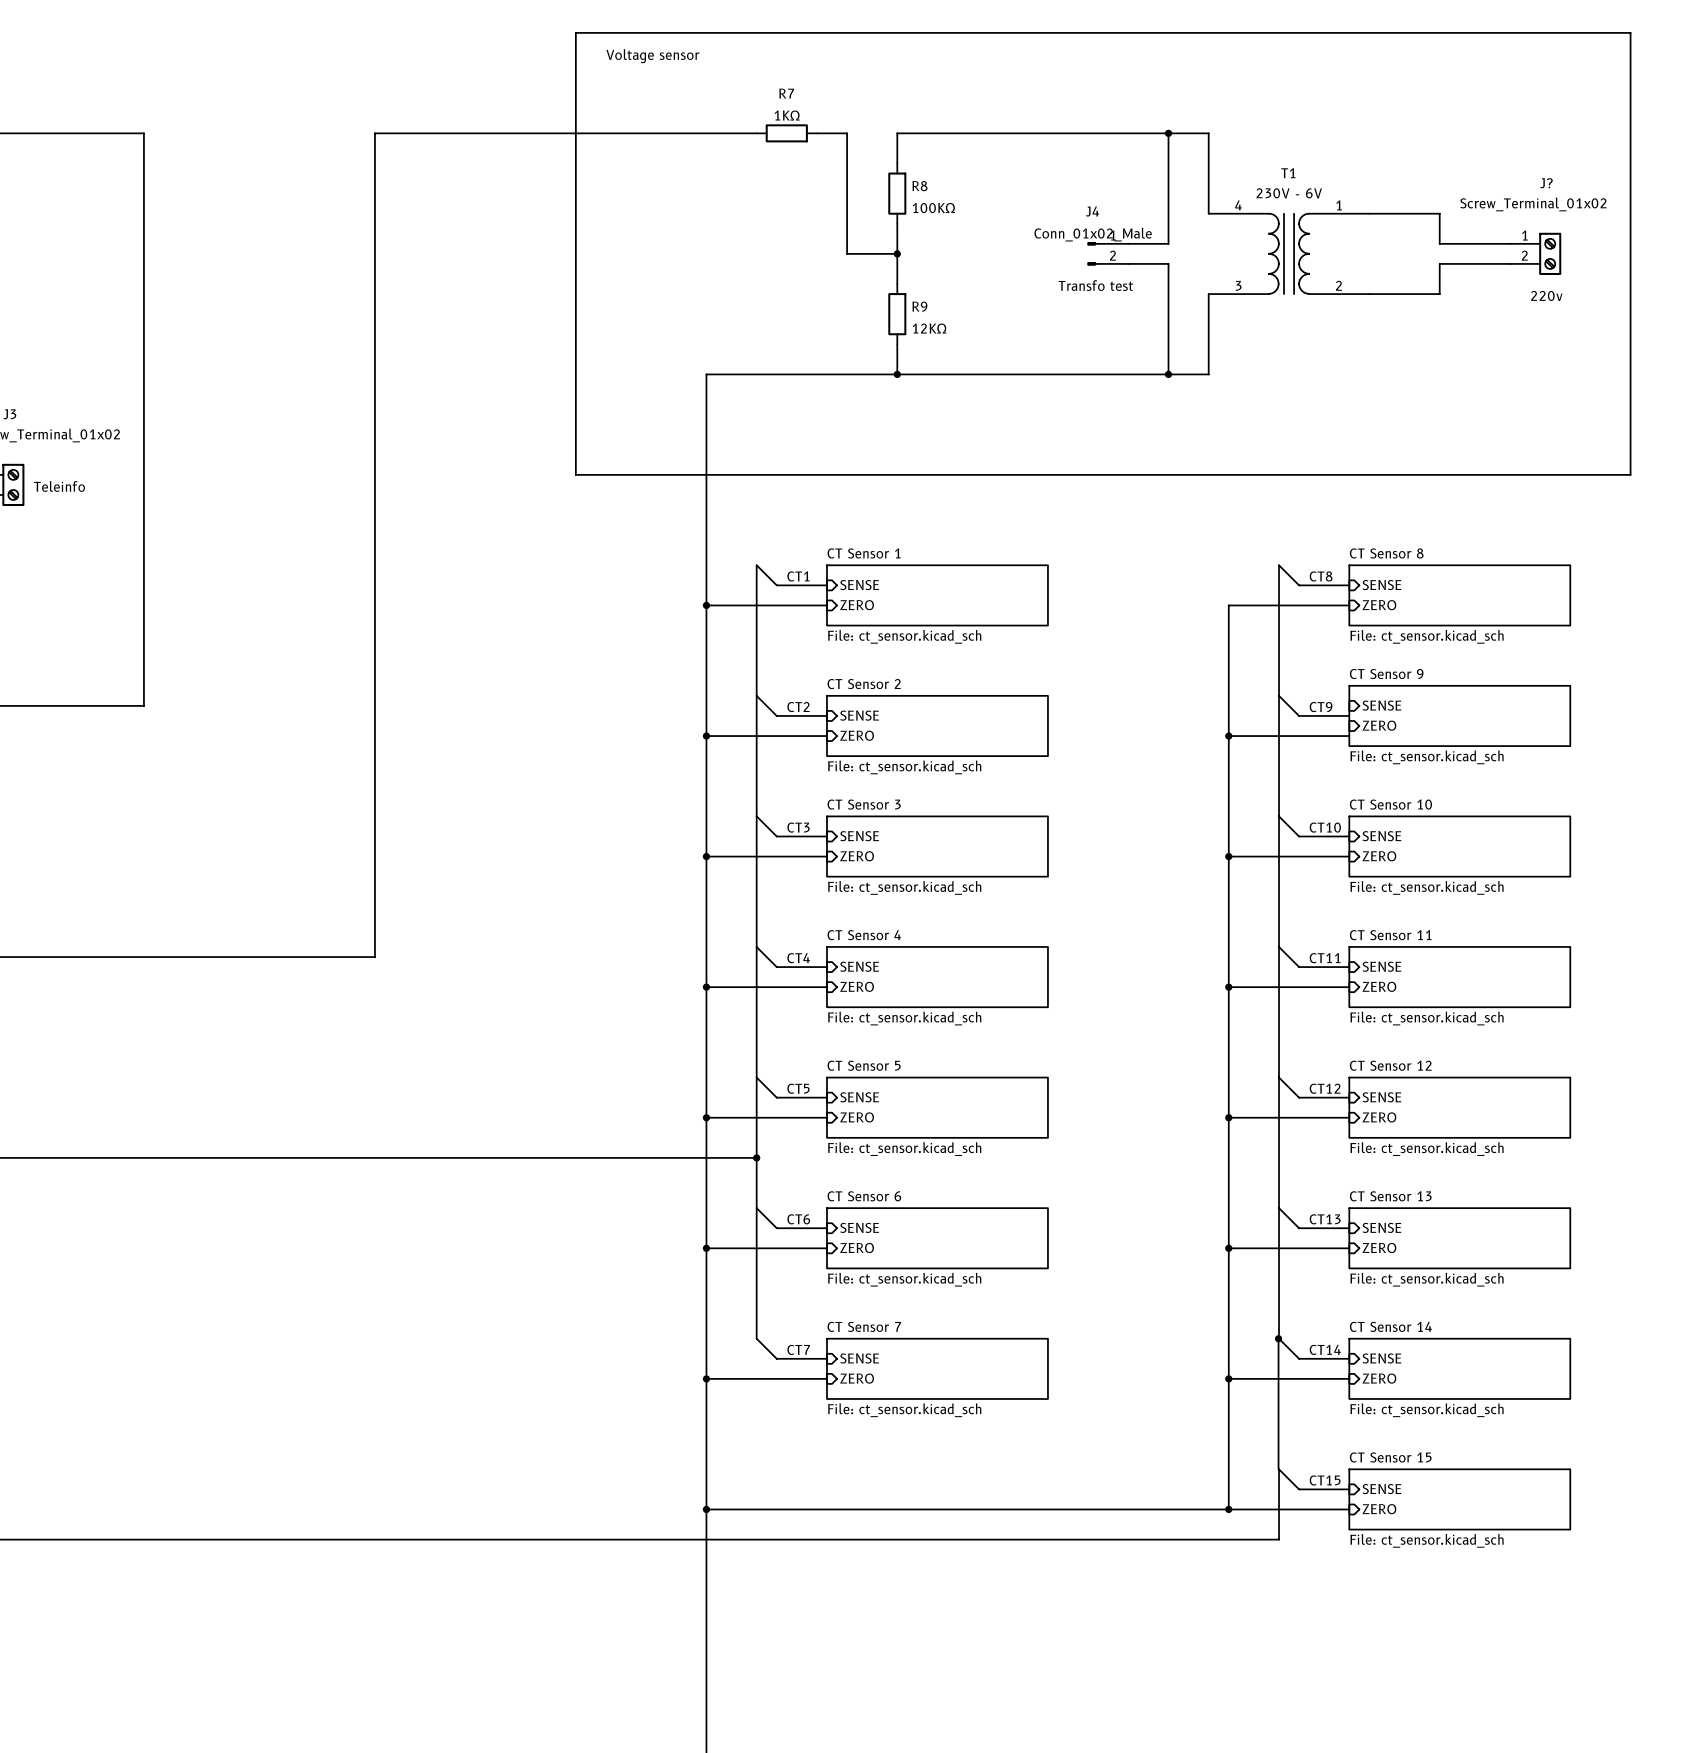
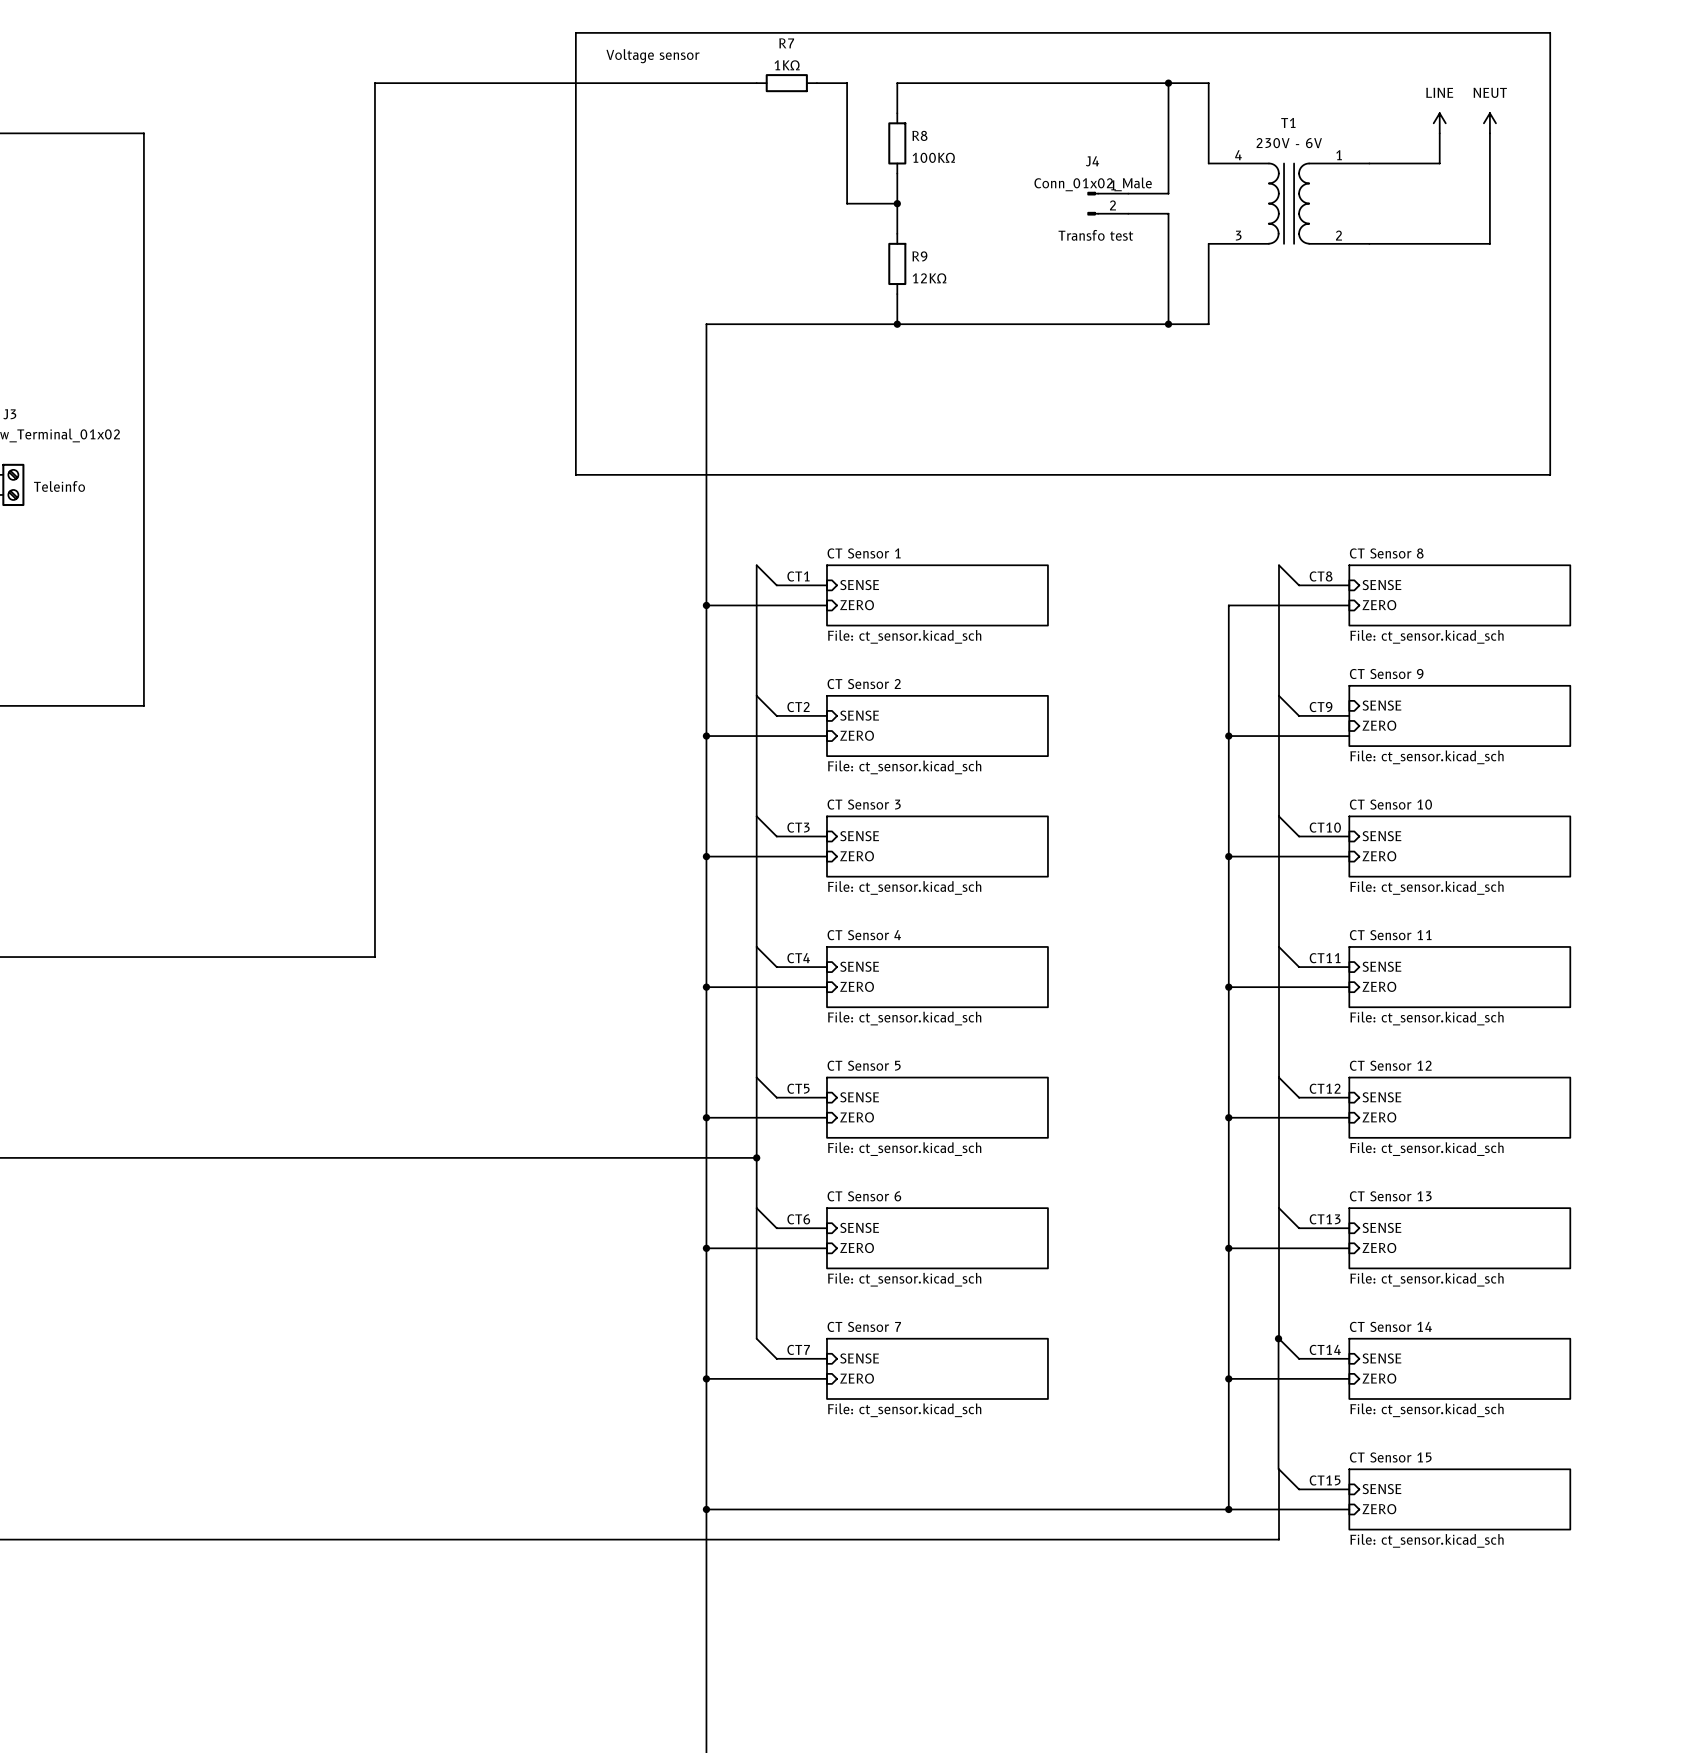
line: (1550, 32) (1630, 32) (1630, 474) (1550, 474) -> (1550, 32) (1550, 474)
wire: none -> (1168, 83) (1168, 133)
junction: none -> (1168, 83)
power symbol: none -> LINE (1439, 123)
power symbol: none -> NEUT (1489, 123)
wire: (374, 133) (756, 133) -> (374, 133) (374, 83) (756, 83)
R7 position: (786, 133) -> (786, 83)
wire: (816, 133) (847, 133) -> (816, 83) (847, 83) (847, 133)
junction: (1168, 133) -> none
wire: (1208, 133) (897, 133) (897, 163) -> (1208, 133) (1208, 83) (897, 83) (897, 113)
wire: none -> (1439, 133) (1439, 163) (1369, 163)
wire: (1208, 163) (1208, 213) -> (1208, 243) (1208, 294)
R8 position: (897, 193) -> (897, 143)
wire: (1168, 193) (1168, 213) -> (1168, 193) (1128, 193)
wire: (847, 203) (847, 253) (897, 253) -> (847, 203) (897, 203)
junction: none -> (897, 203)
wire: (1369, 213) (1439, 213) (1439, 243) -> (1369, 243) (1439, 243)
wire: (897, 233) (897, 284) -> (897, 173) (897, 223)
wire: (1128, 243) (1168, 243) -> (1168, 263) (1168, 243)
wire: (1489, 243) (1510, 243) -> (1489, 243) (1489, 133)
junction: (897, 253) -> none
J4 position: (1107, 253) -> (1107, 203)
T1 position: (1289, 253) -> (1289, 203)
J?: Screw_Terminal_01x02 (1535, 253) -> none
wire: (1128, 263) (1168, 263) -> (1128, 213) (1168, 213)
wire: (1510, 263) (1439, 263) (1439, 294) (1369, 294) -> none
text position: Transfo test (1095, 285) -> Transfo test (1095, 235)
text: 220v (1546, 295) -> none
R9 position: (897, 314) -> (897, 263)
junction: none -> (897, 324)
wire: (1168, 324) (1168, 374) -> none
junction: none -> (1168, 324)
wire: (1208, 324) (1208, 374) (706, 374) -> (1208, 324) (706, 324) (706, 374)
wire: (897, 344) (897, 374) -> (897, 294) (897, 324)
junction: (897, 374) -> none
junction: (1168, 374) -> none

